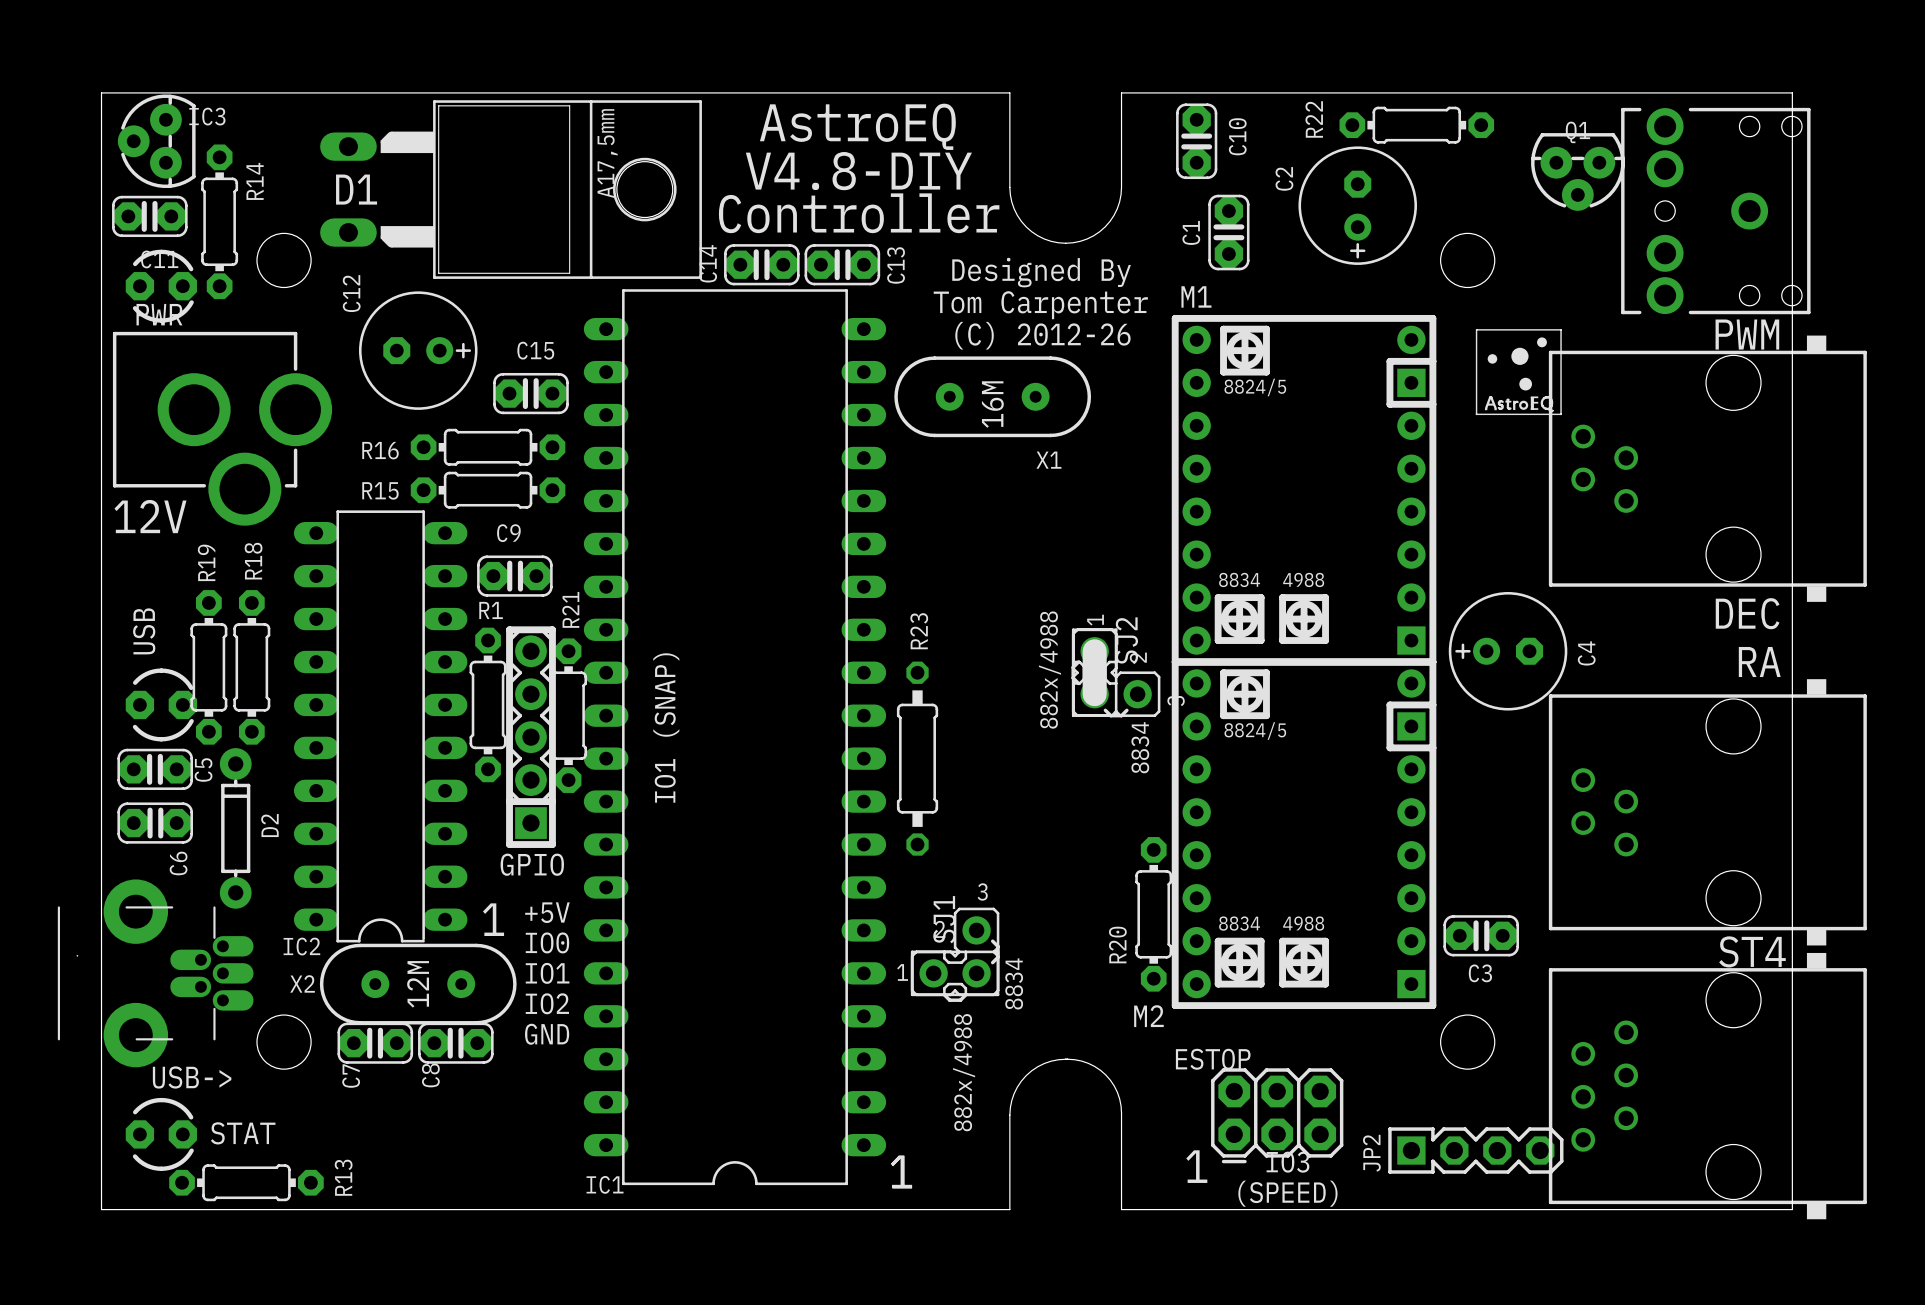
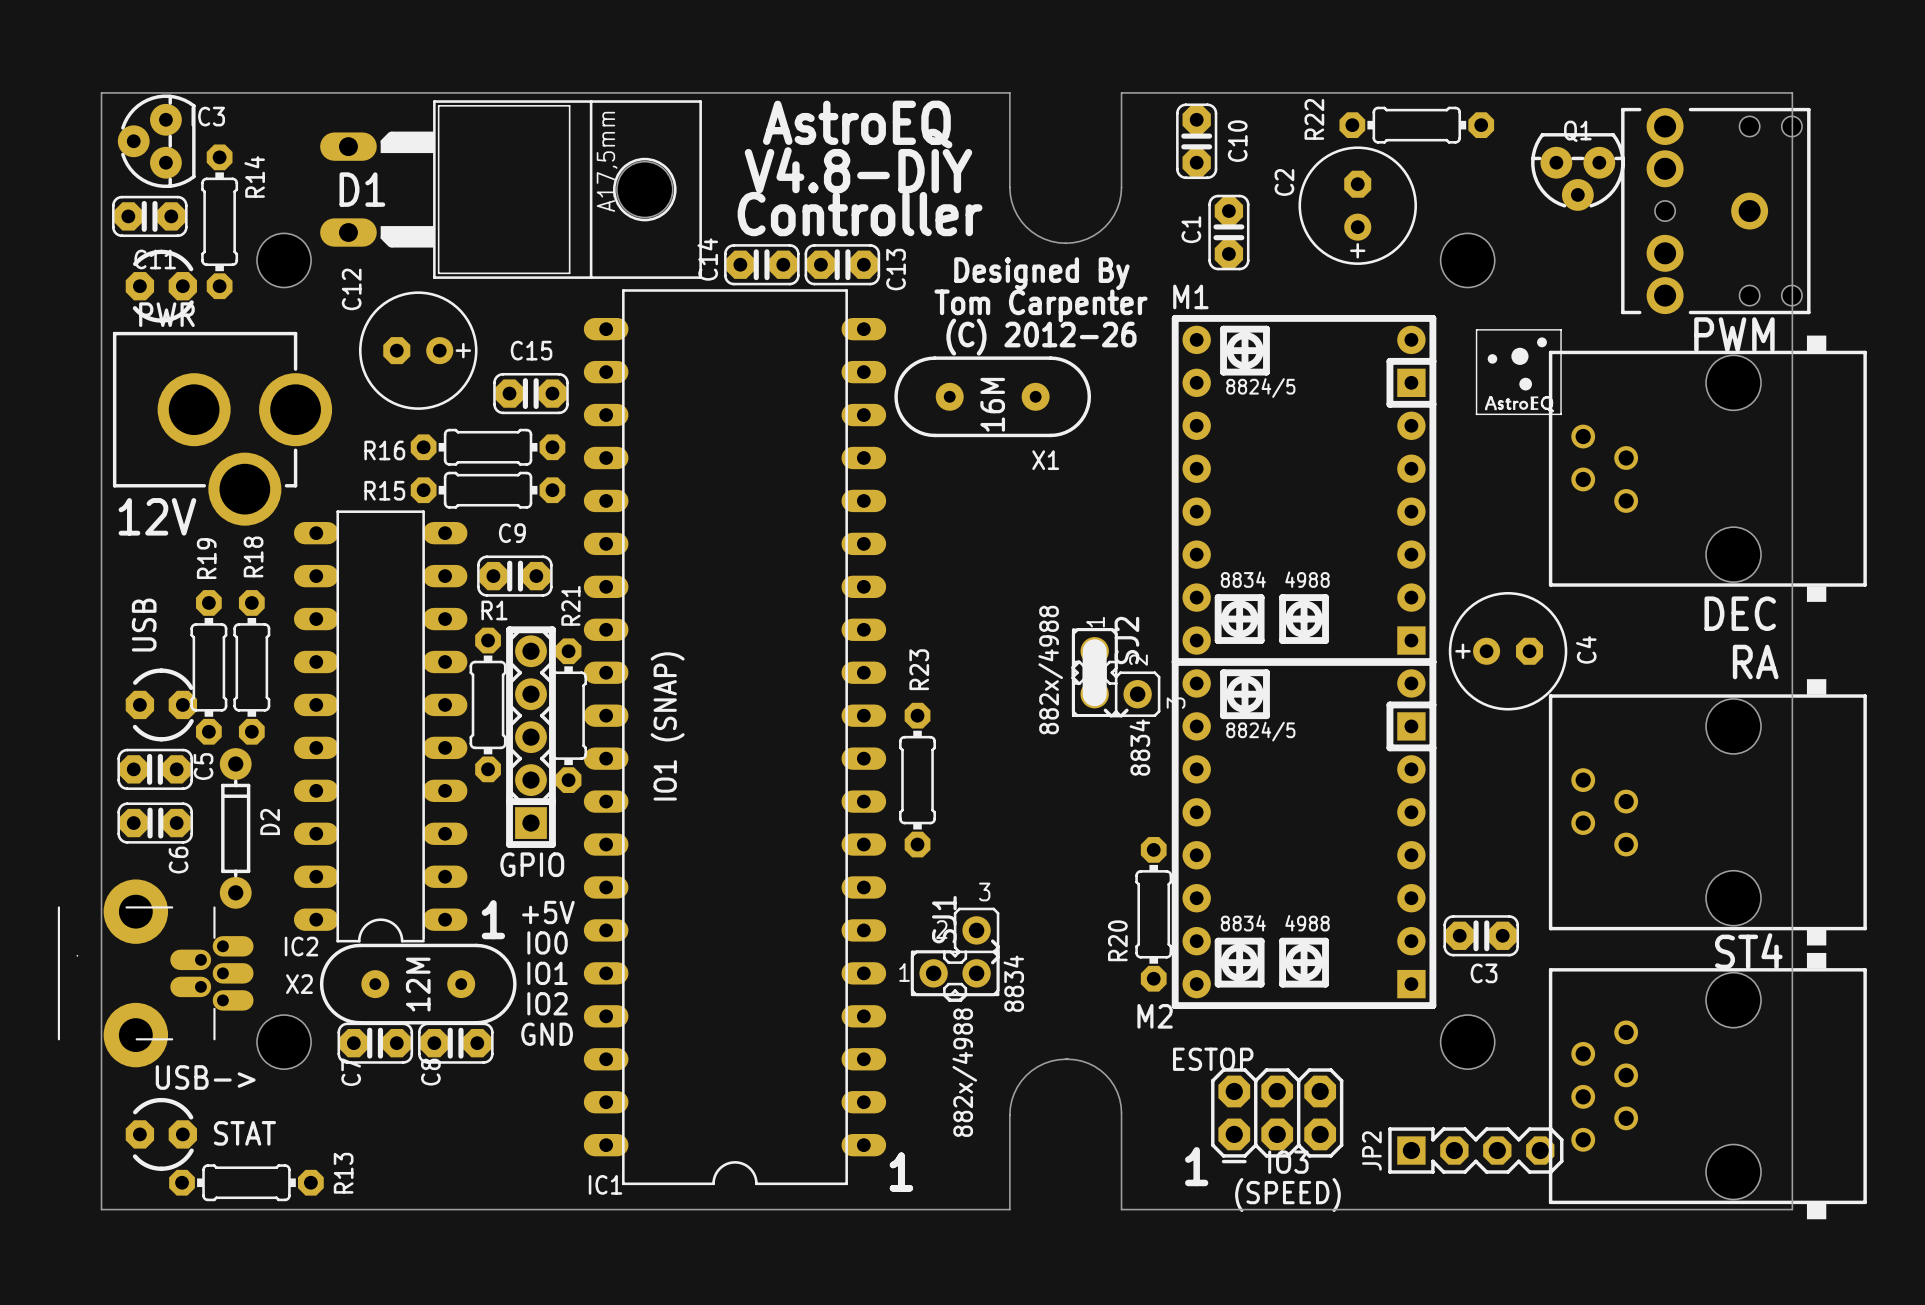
R23 footprint: [896, 661, 939, 856] -> [899, 702, 936, 858]

